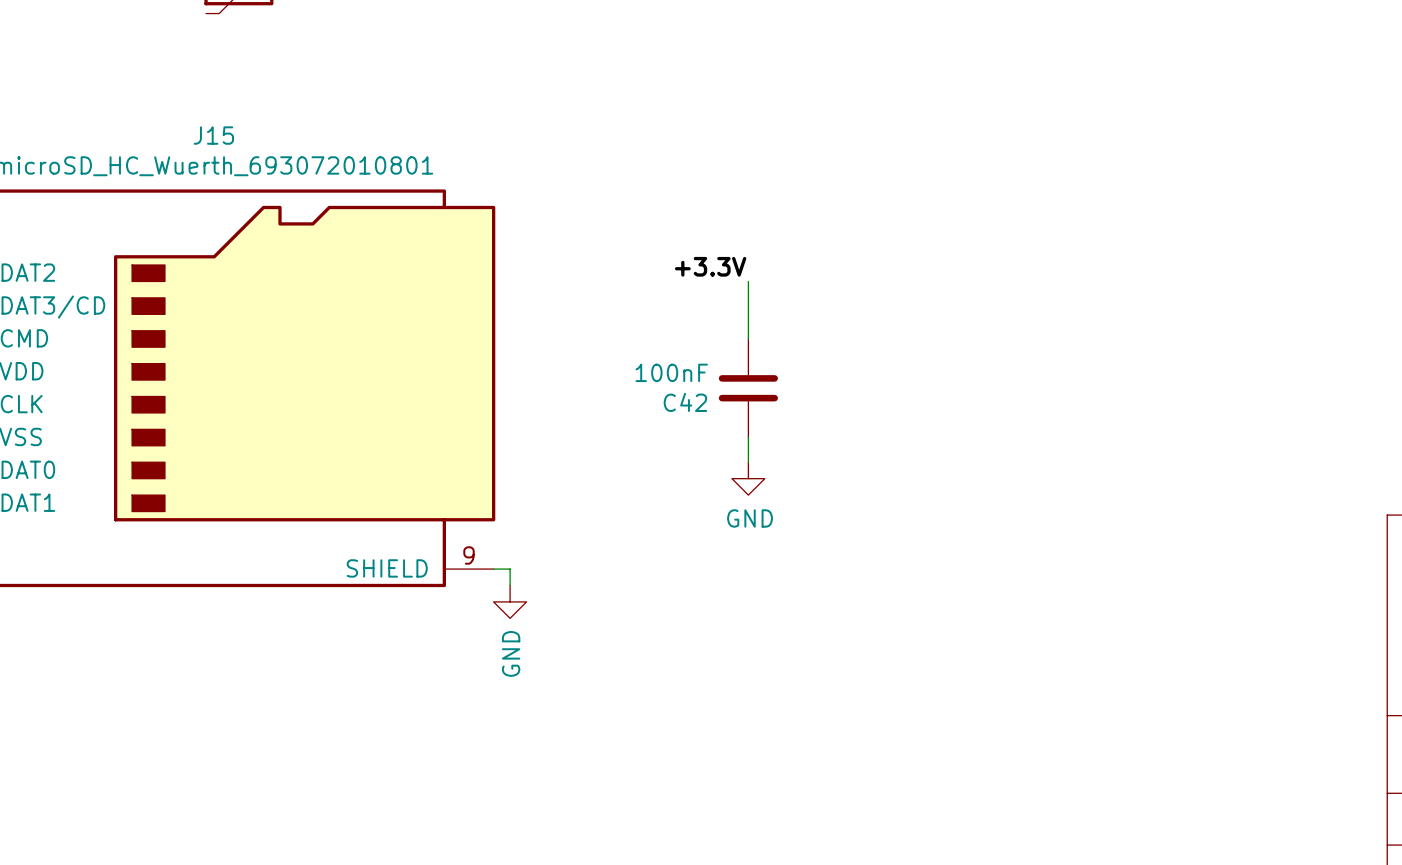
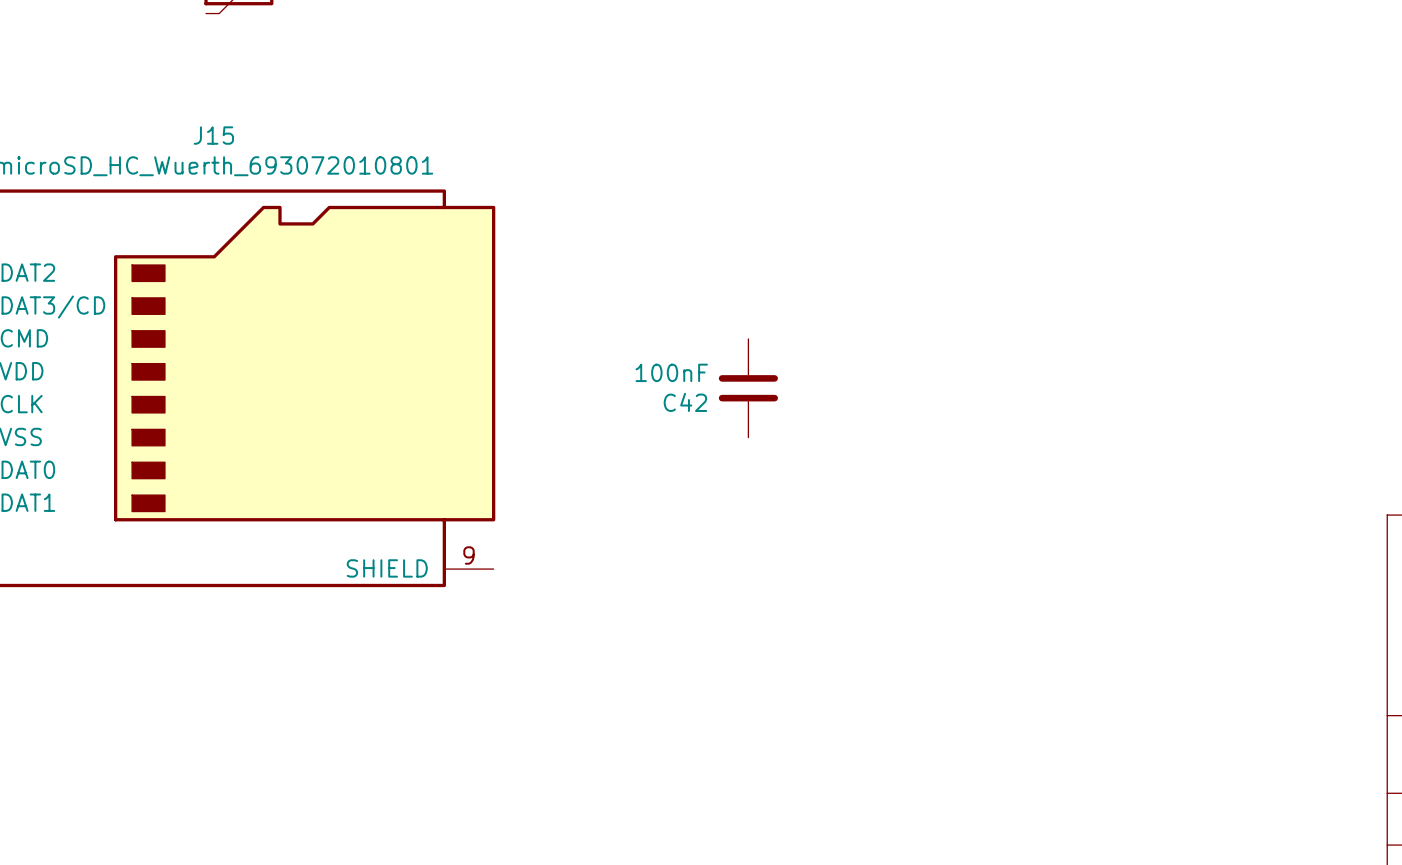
label: +3.3V (710, 266) -> none
wire: (748, 281) (748, 338) -> none
wire: (748, 437) (748, 462) -> none
power symbol: GND (748, 478) -> none
wire: (493, 569) (510, 569) (510, 585) -> none
power symbol: GND (510, 601) -> none

